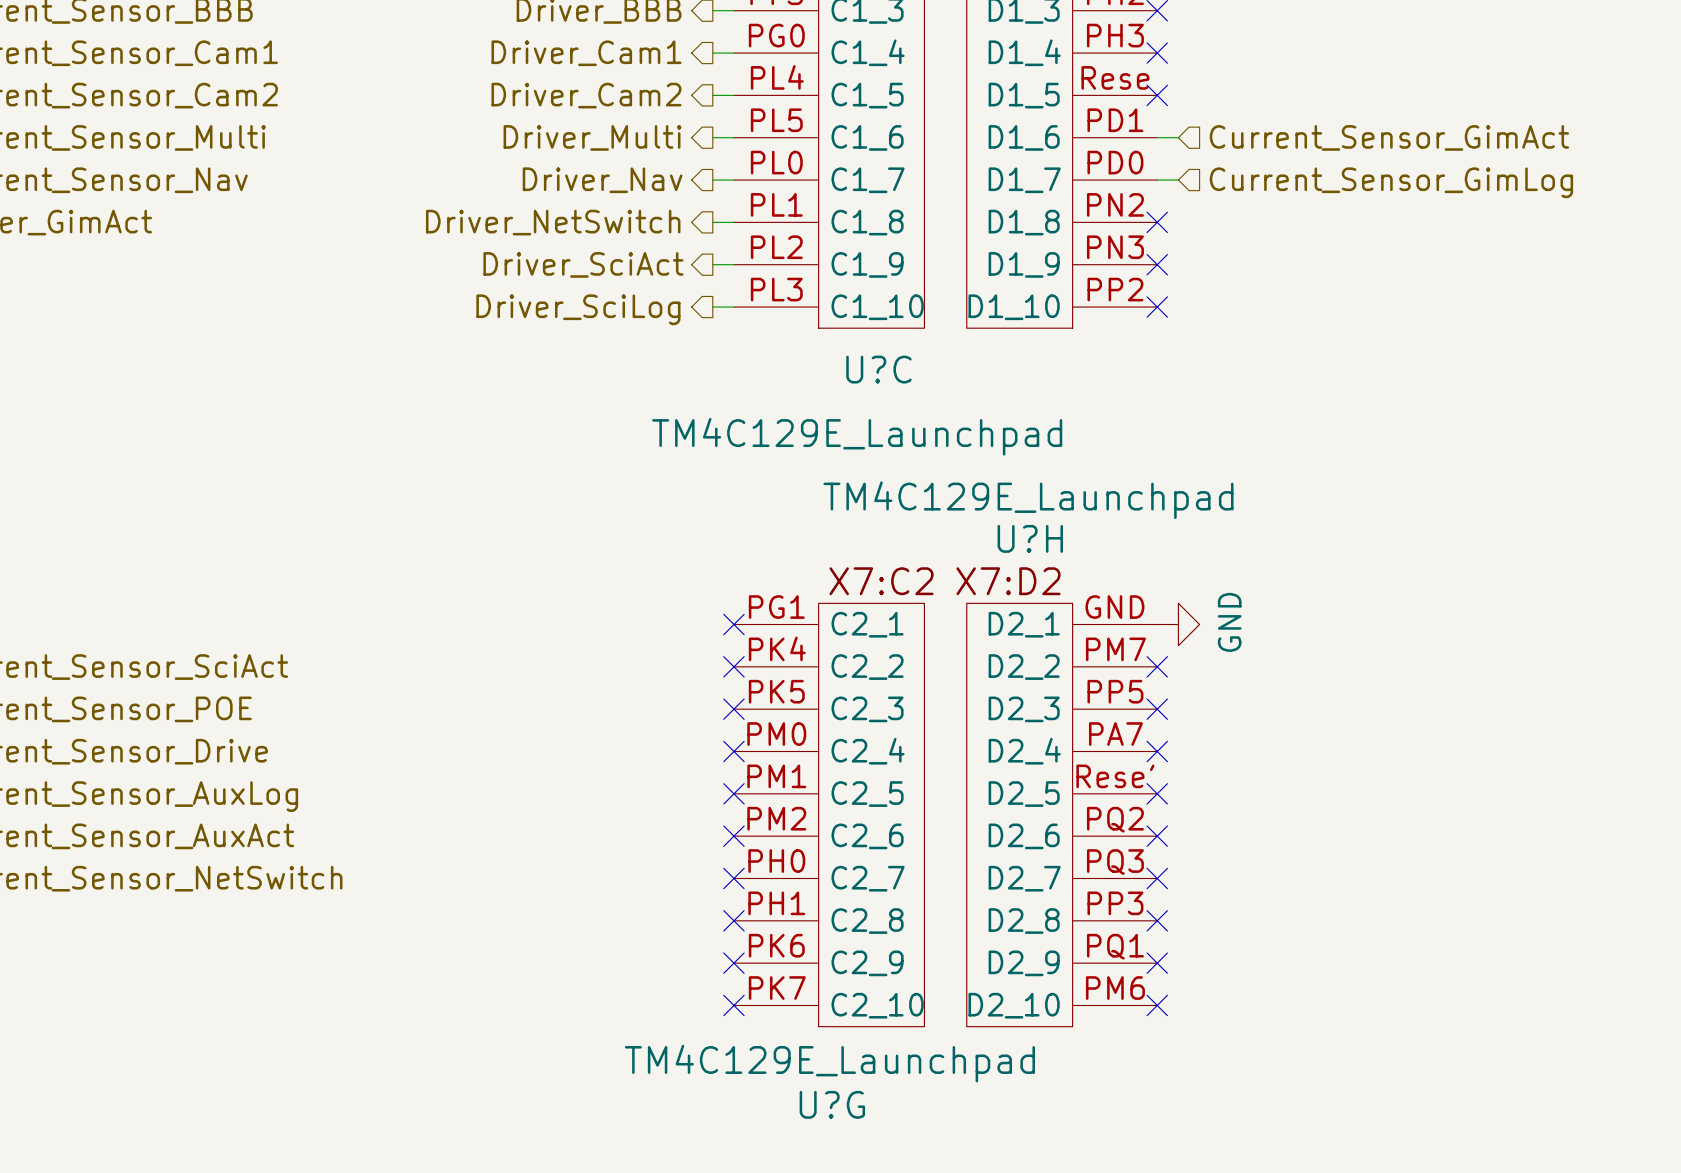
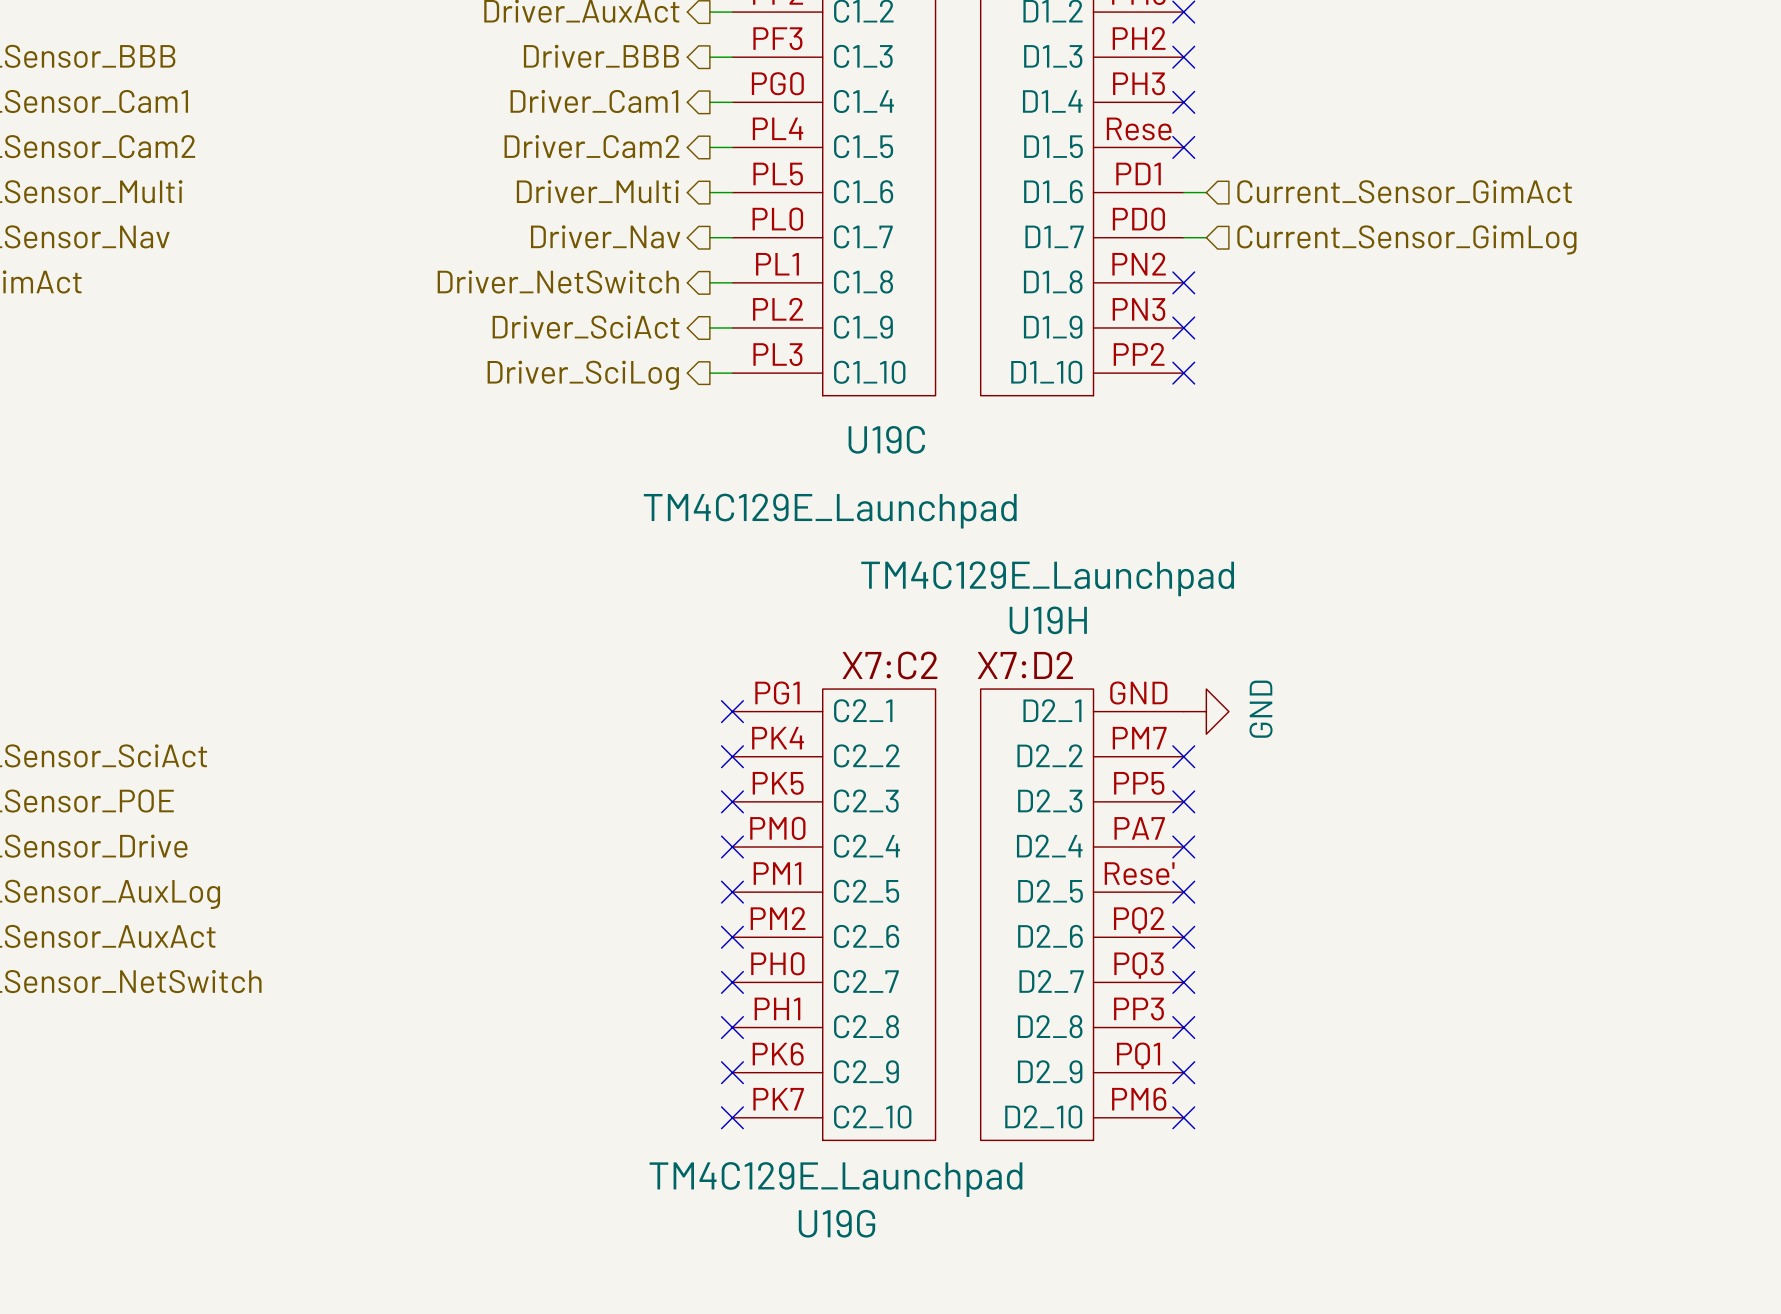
U?C name: U?C (878, 369) -> U19C (886, 439)
U?H name: U?H (1030, 538) -> U19H (1048, 620)
U?G name: U?G (832, 1104) -> U19G (836, 1223)

